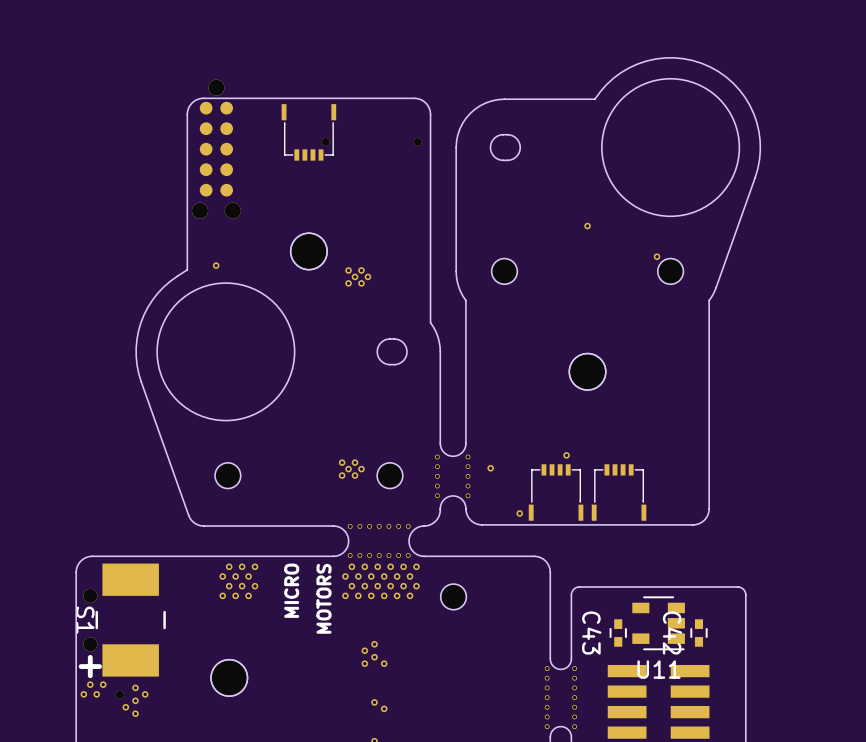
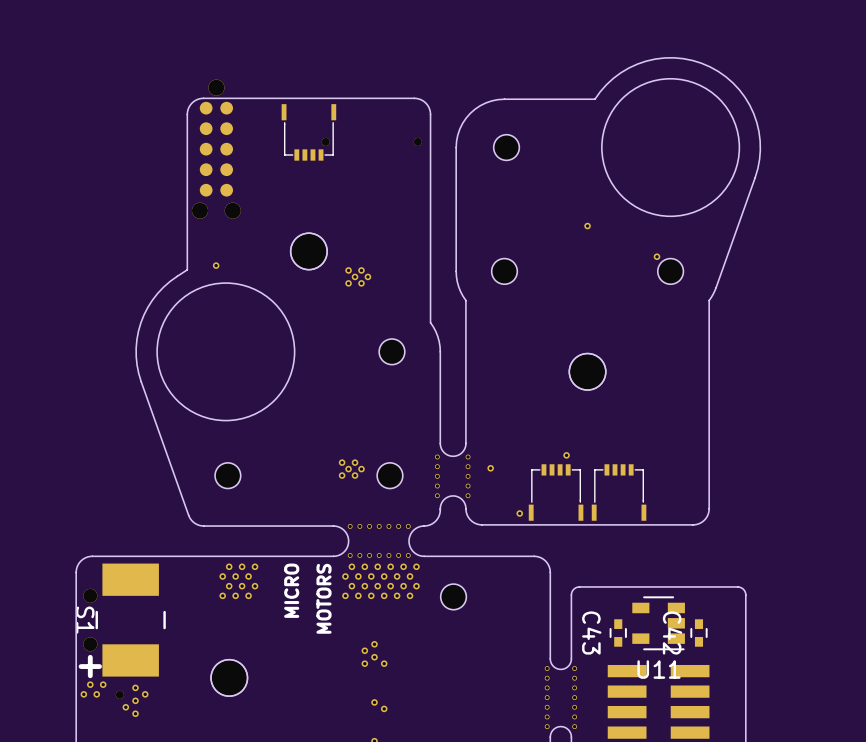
round board edge: none -> [492, 133, 521, 162]
board edge: (507, 134) (496, 136) (490, 144) (492, 153) (499, 159) (512, 159) (519, 150) (517, 139) (507, 134) -> none
part: none -> (506, 147)
round board edge: none -> [378, 338, 406, 366]
board edge: (394, 339) (383, 340) (377, 348) (378, 358) (386, 364) (399, 363) (406, 355) (404, 344) (394, 339) -> none
part: none -> (391, 351)

